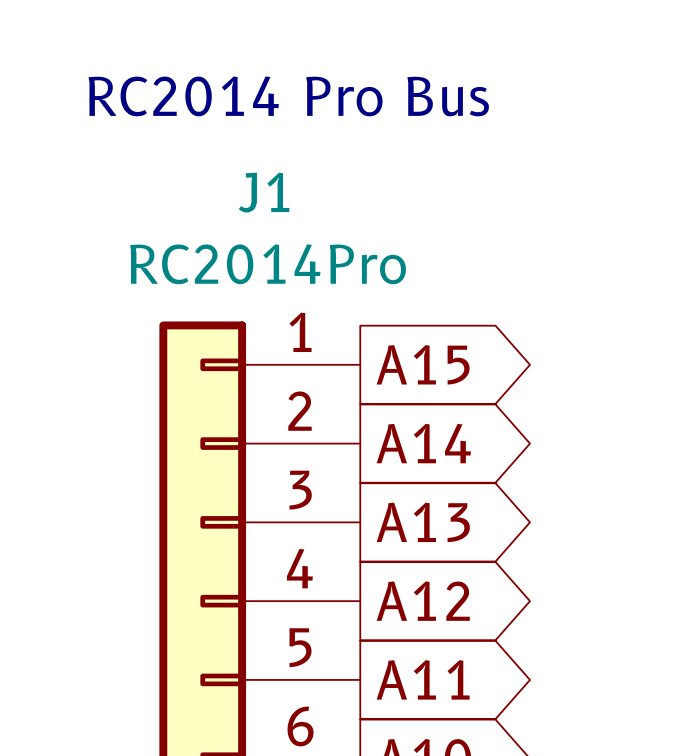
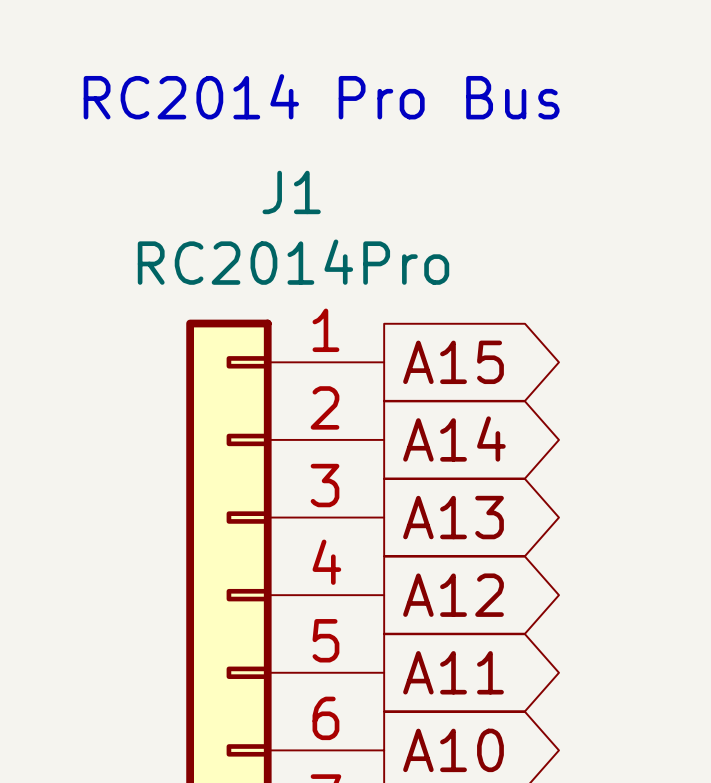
text position: RC2014 Pro Bus (288, 96) -> RC2014 Pro Bus (321, 96)

